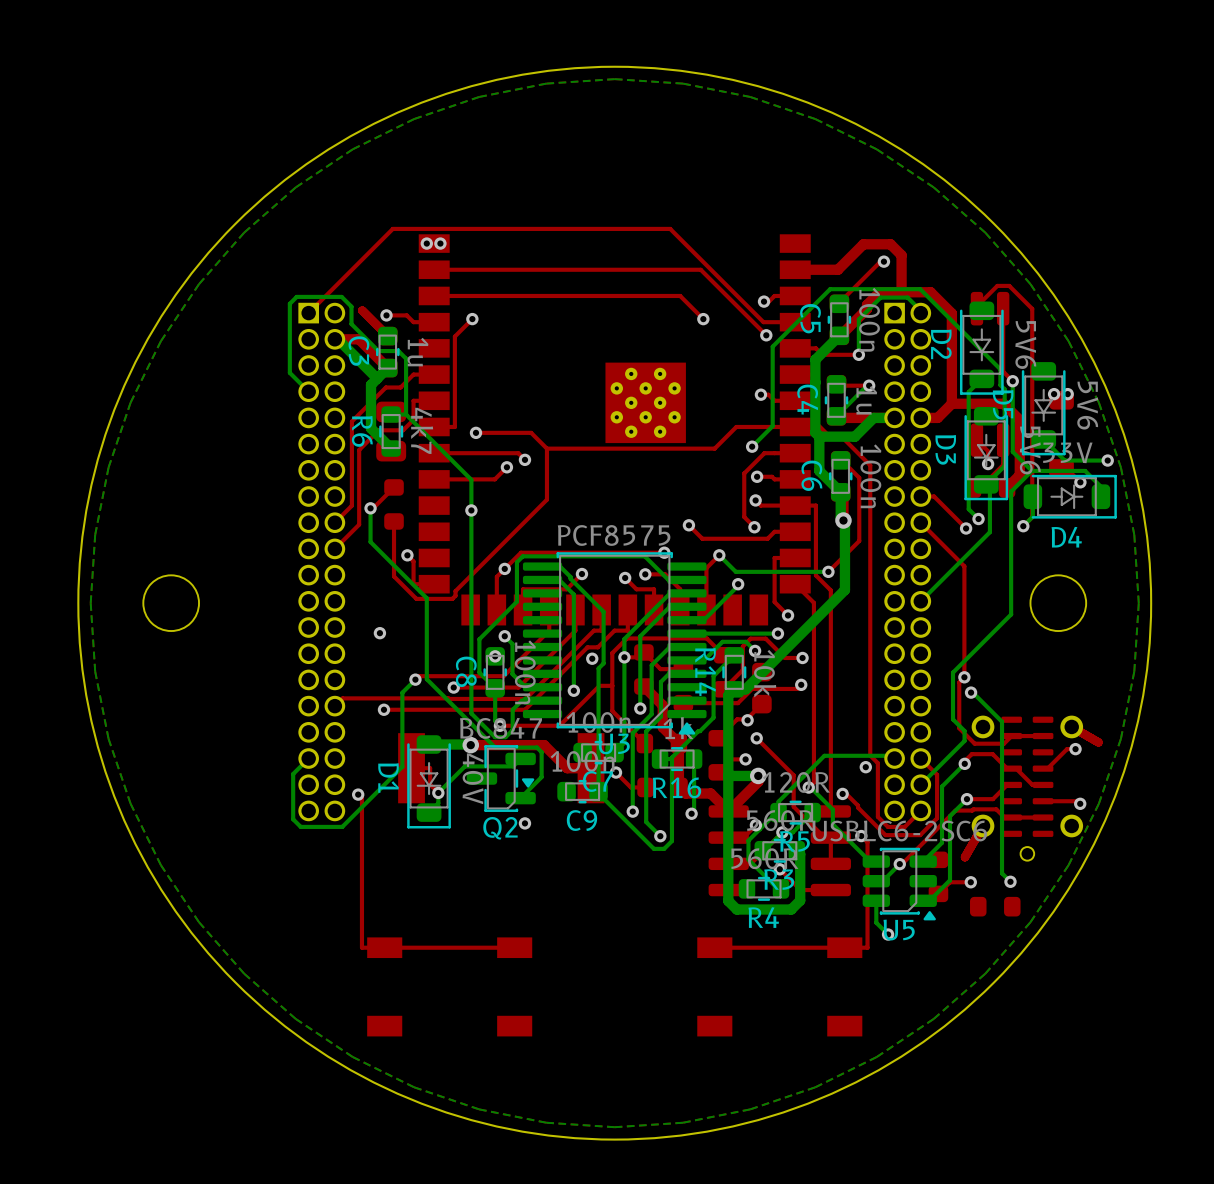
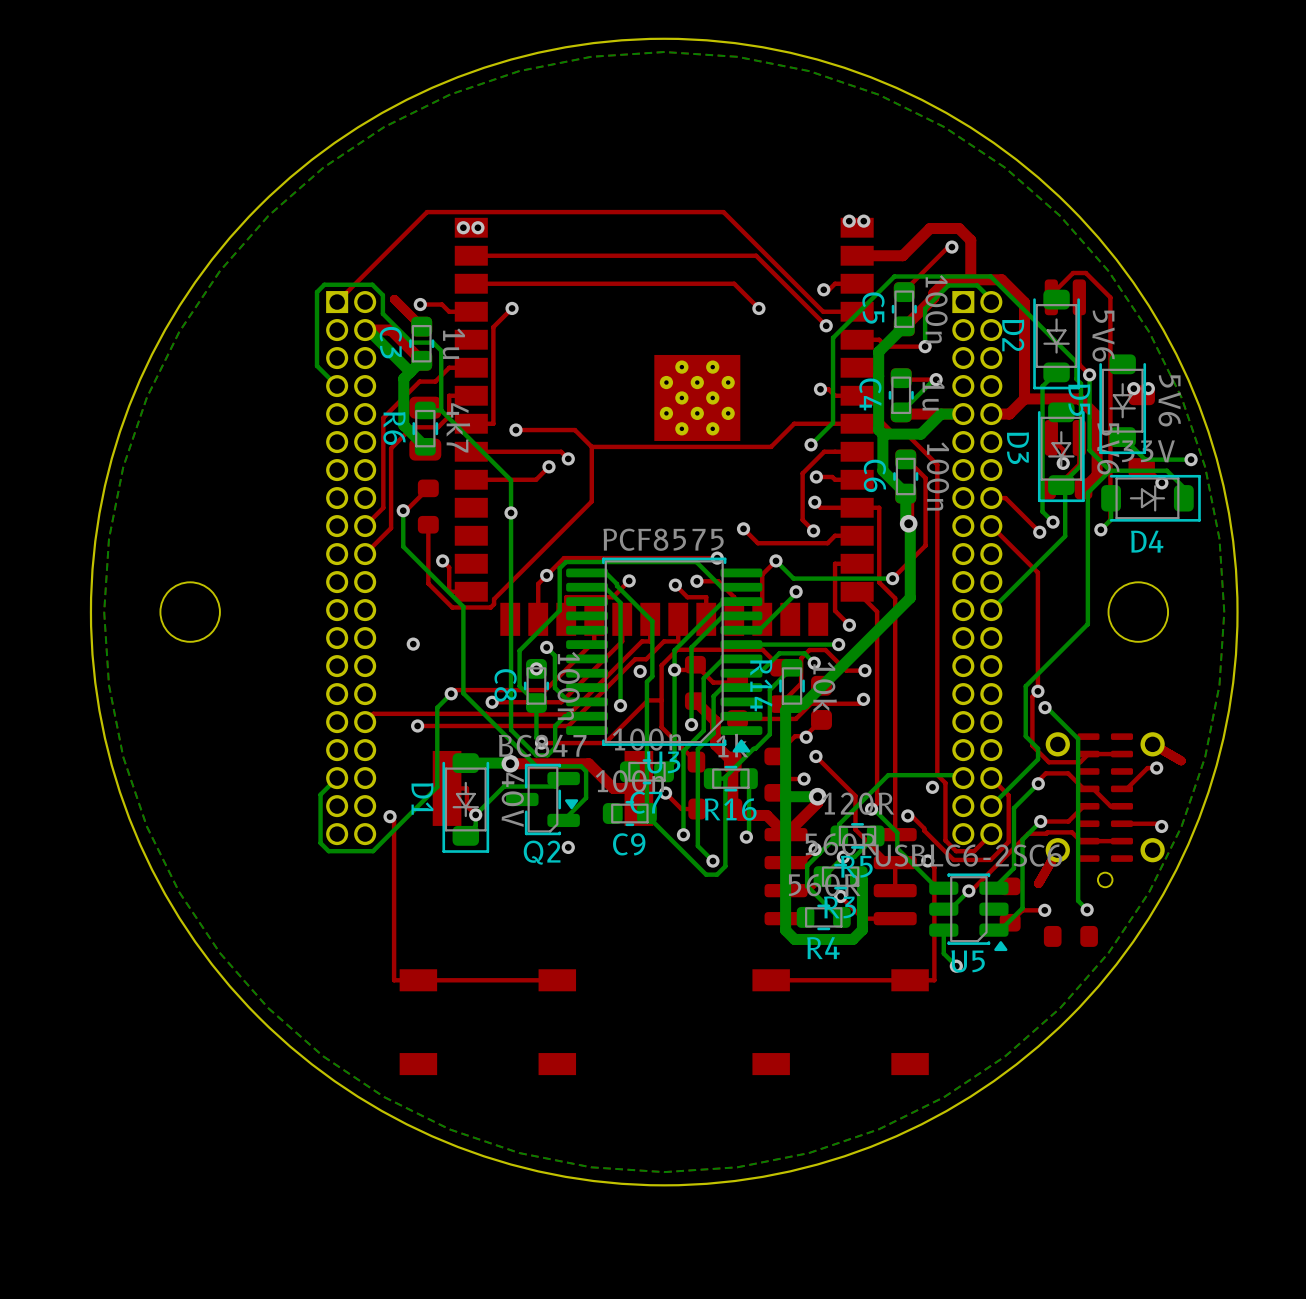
via: none -> (849, 221)
via: none -> (863, 221)

